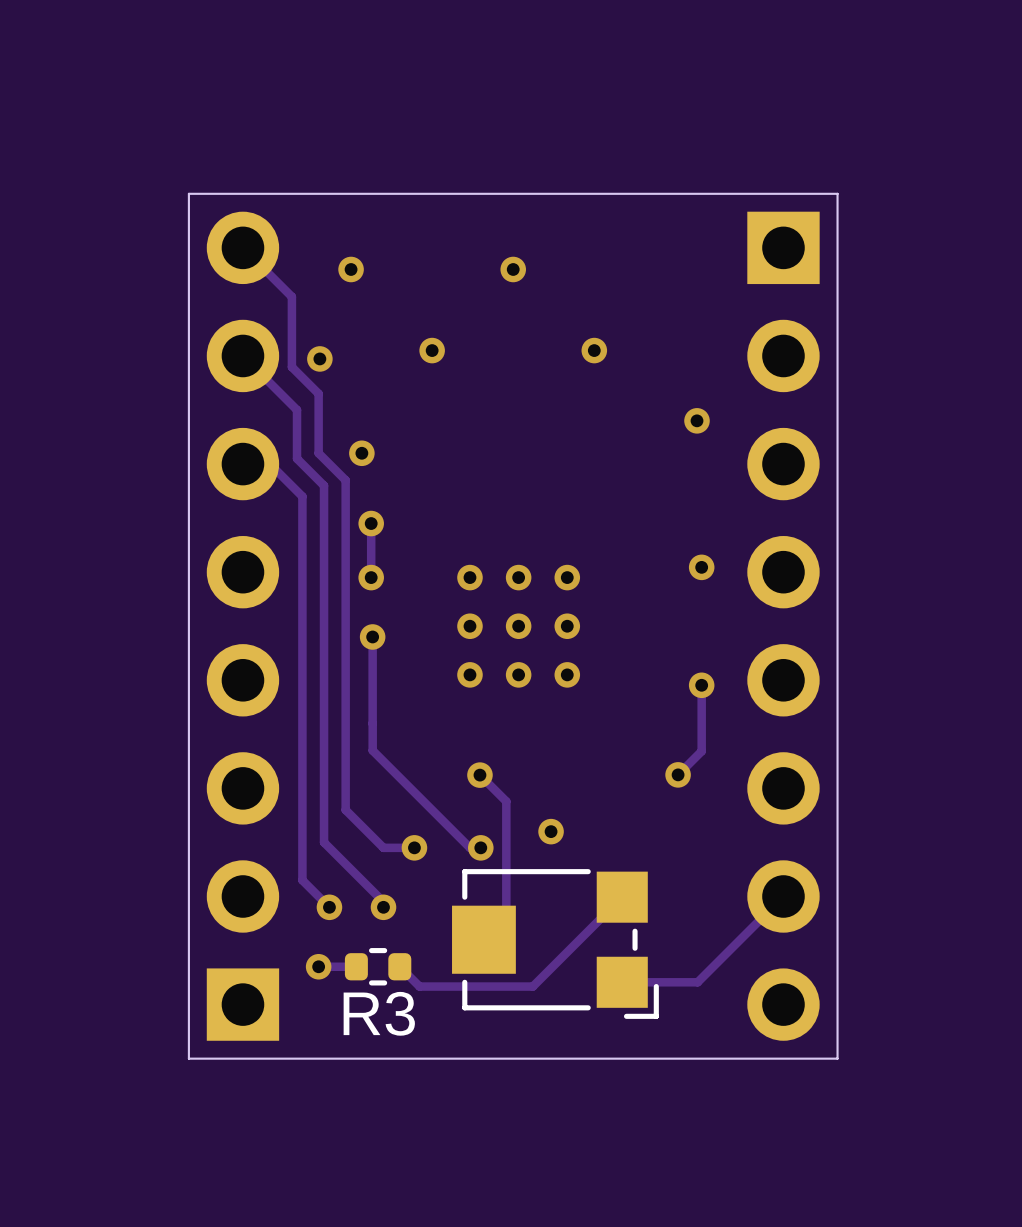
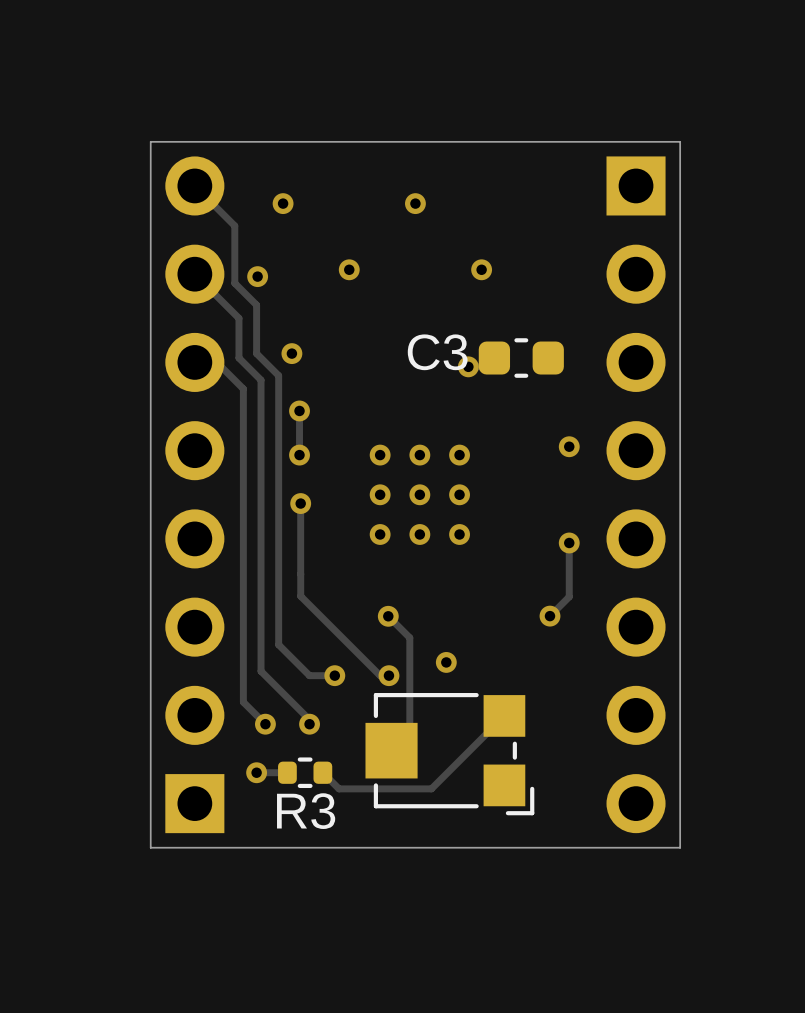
via position: (697, 420) -> (468, 366)
C3: none -> (521, 358)
track: (783, 896) (697, 982) (622, 982) -> none

